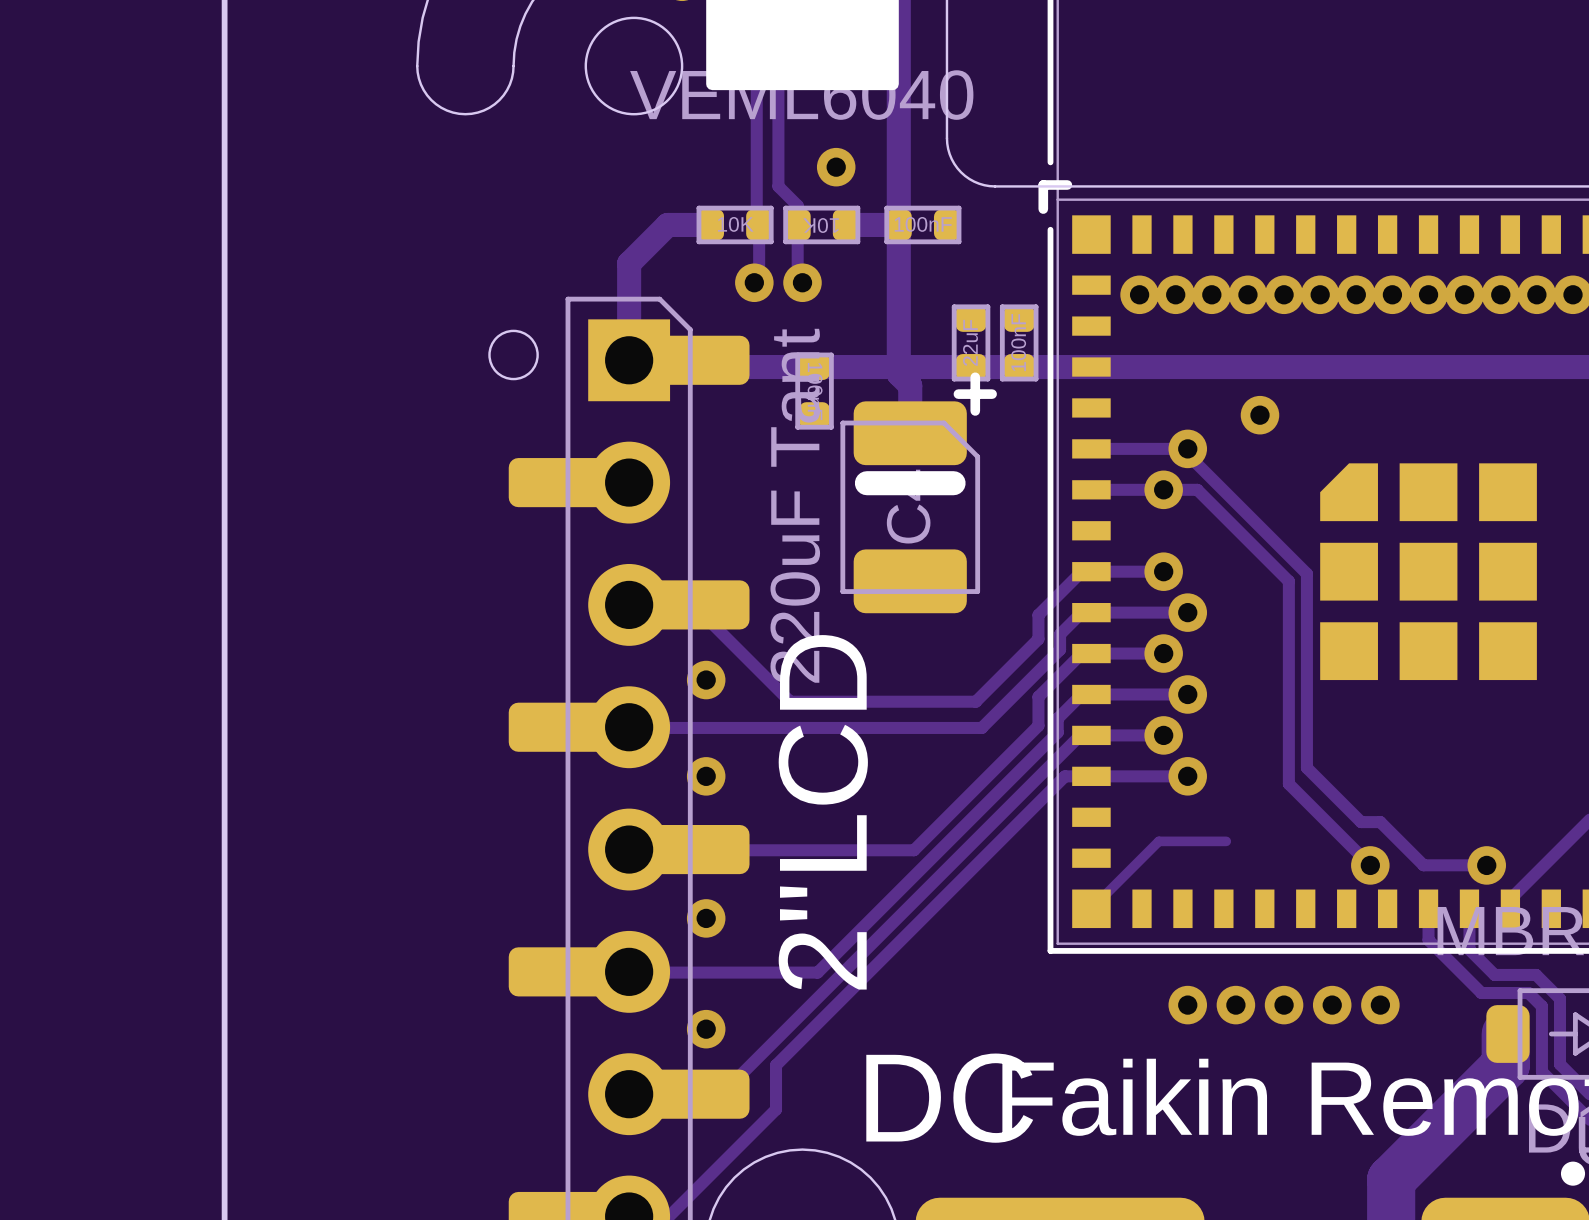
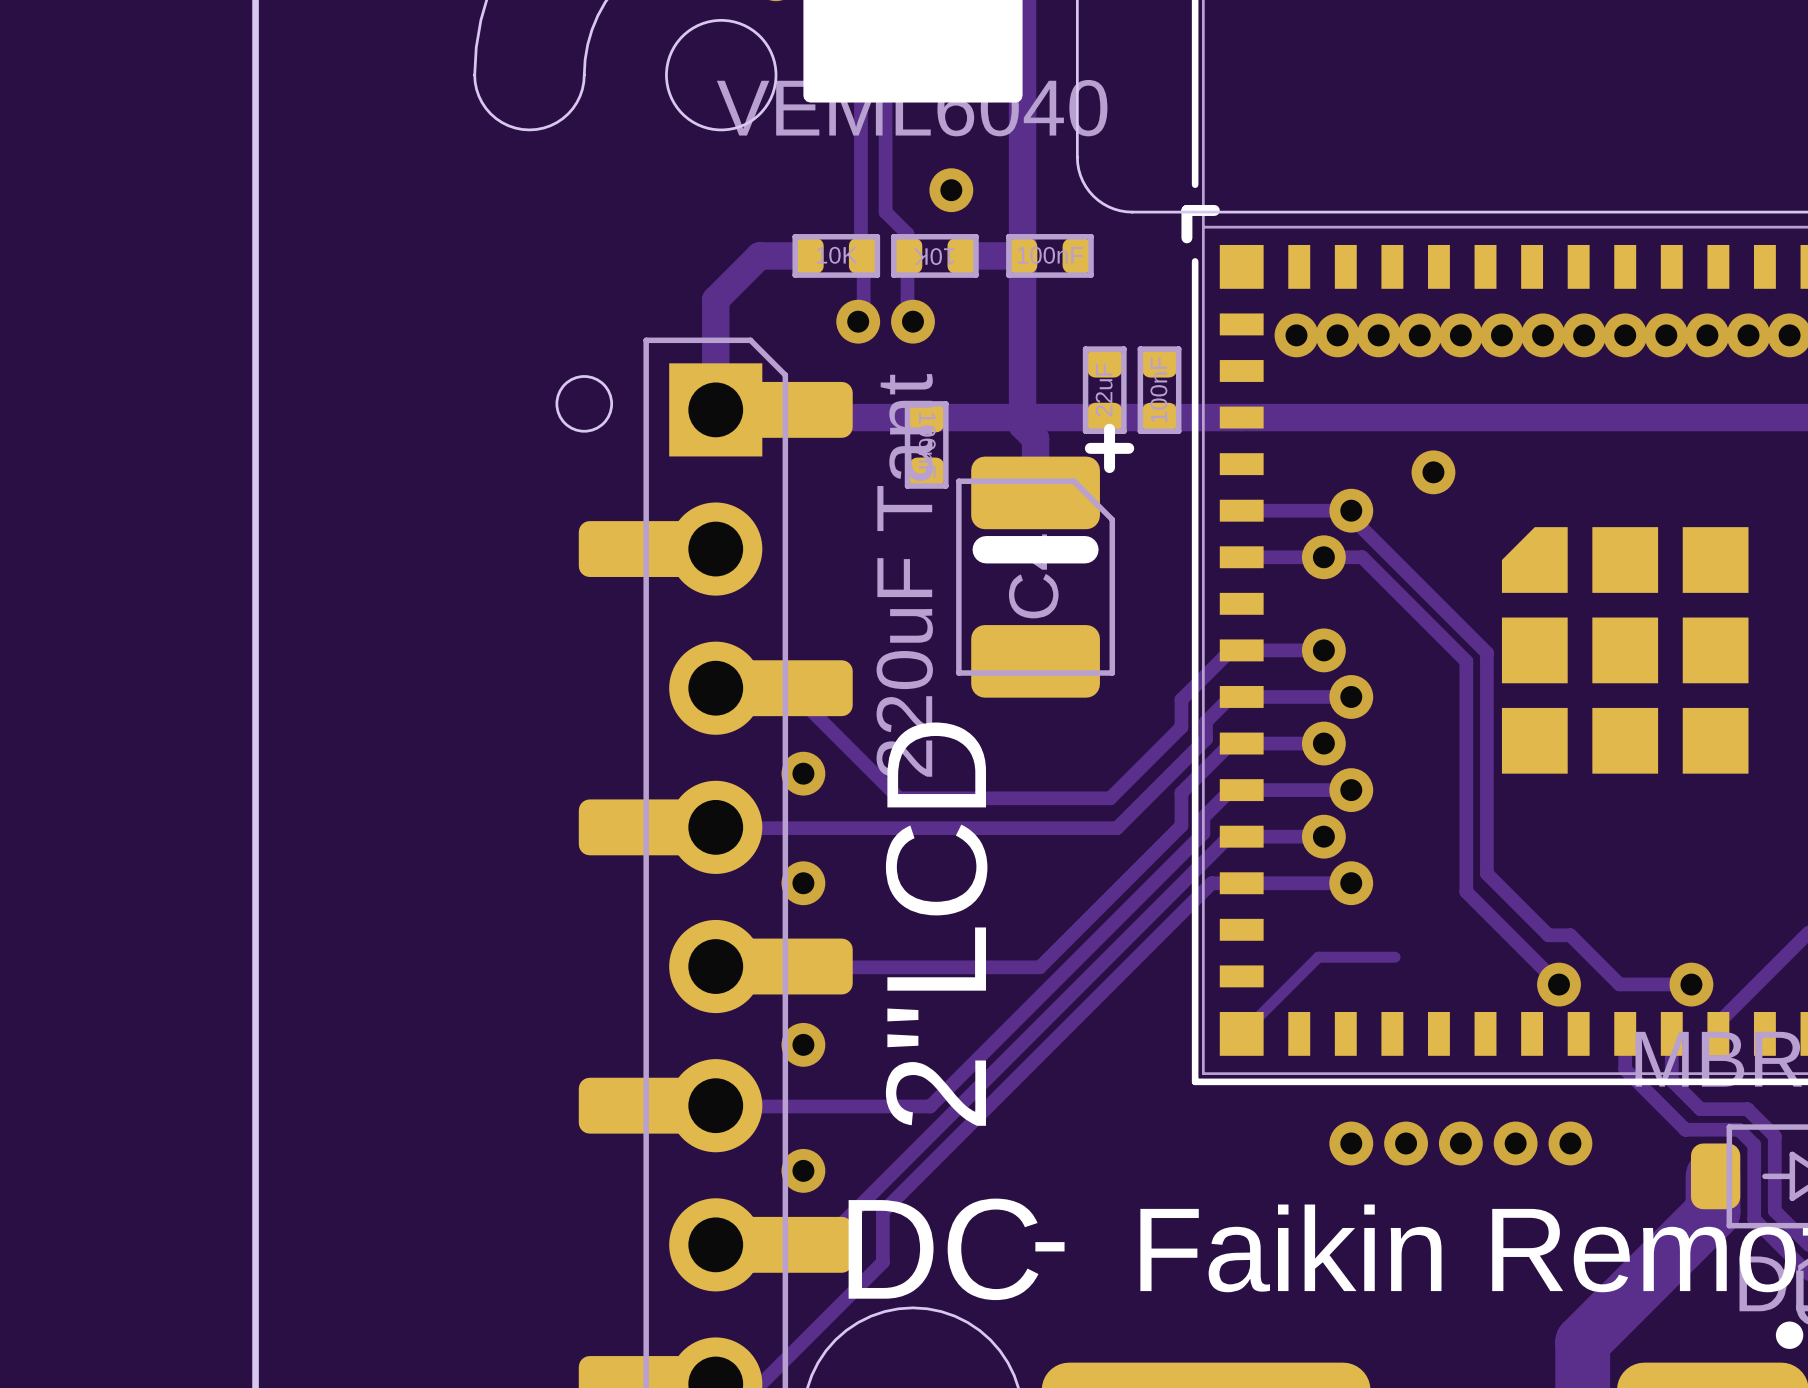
text: none -> DC (943, 1249)
text: DC (949, 1098) -> - (1049, 1246)

